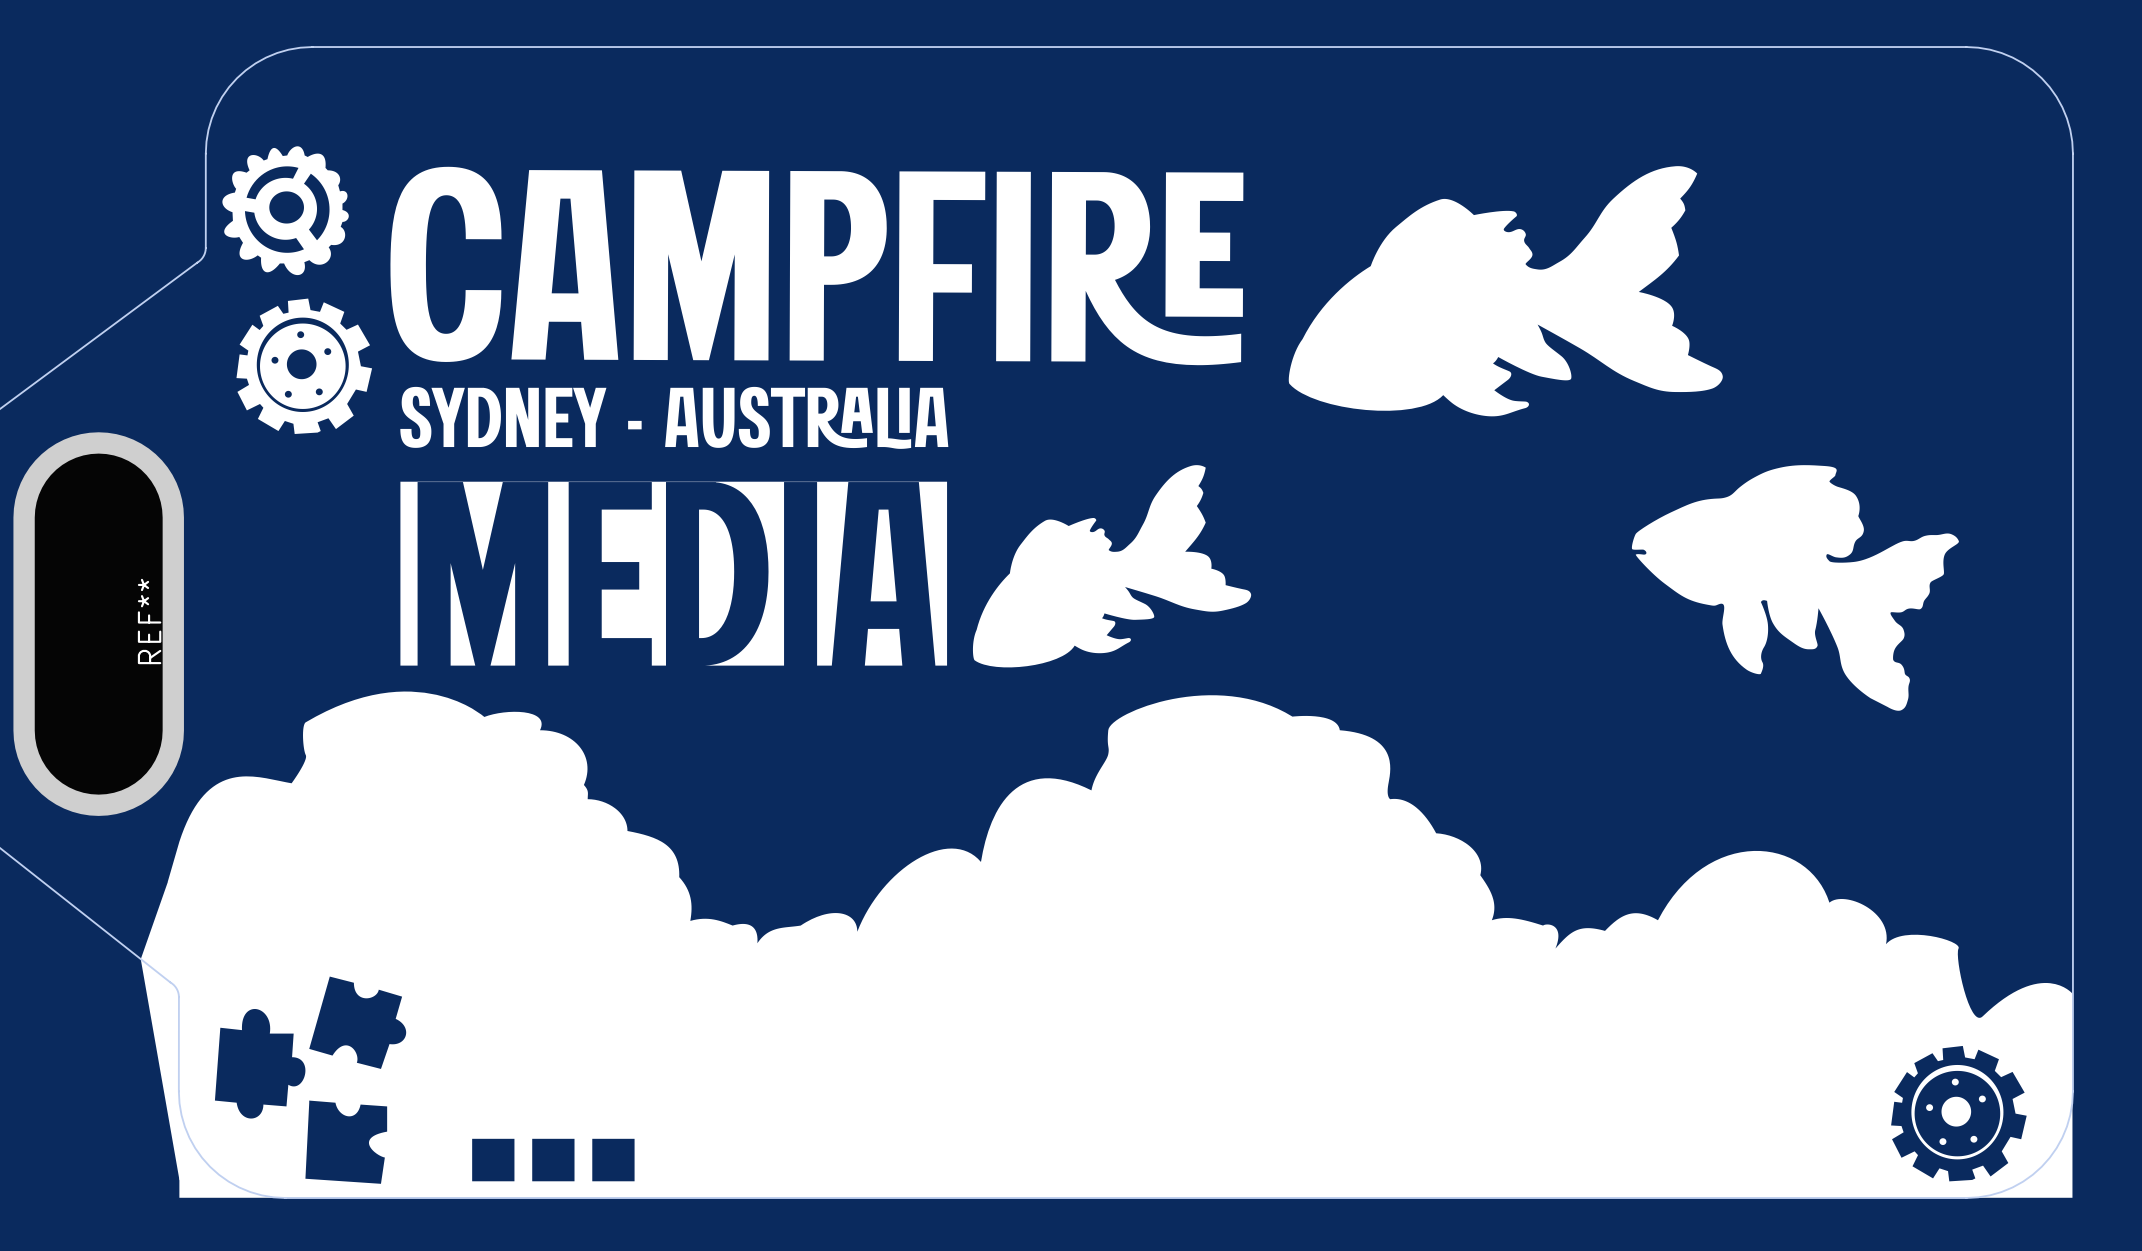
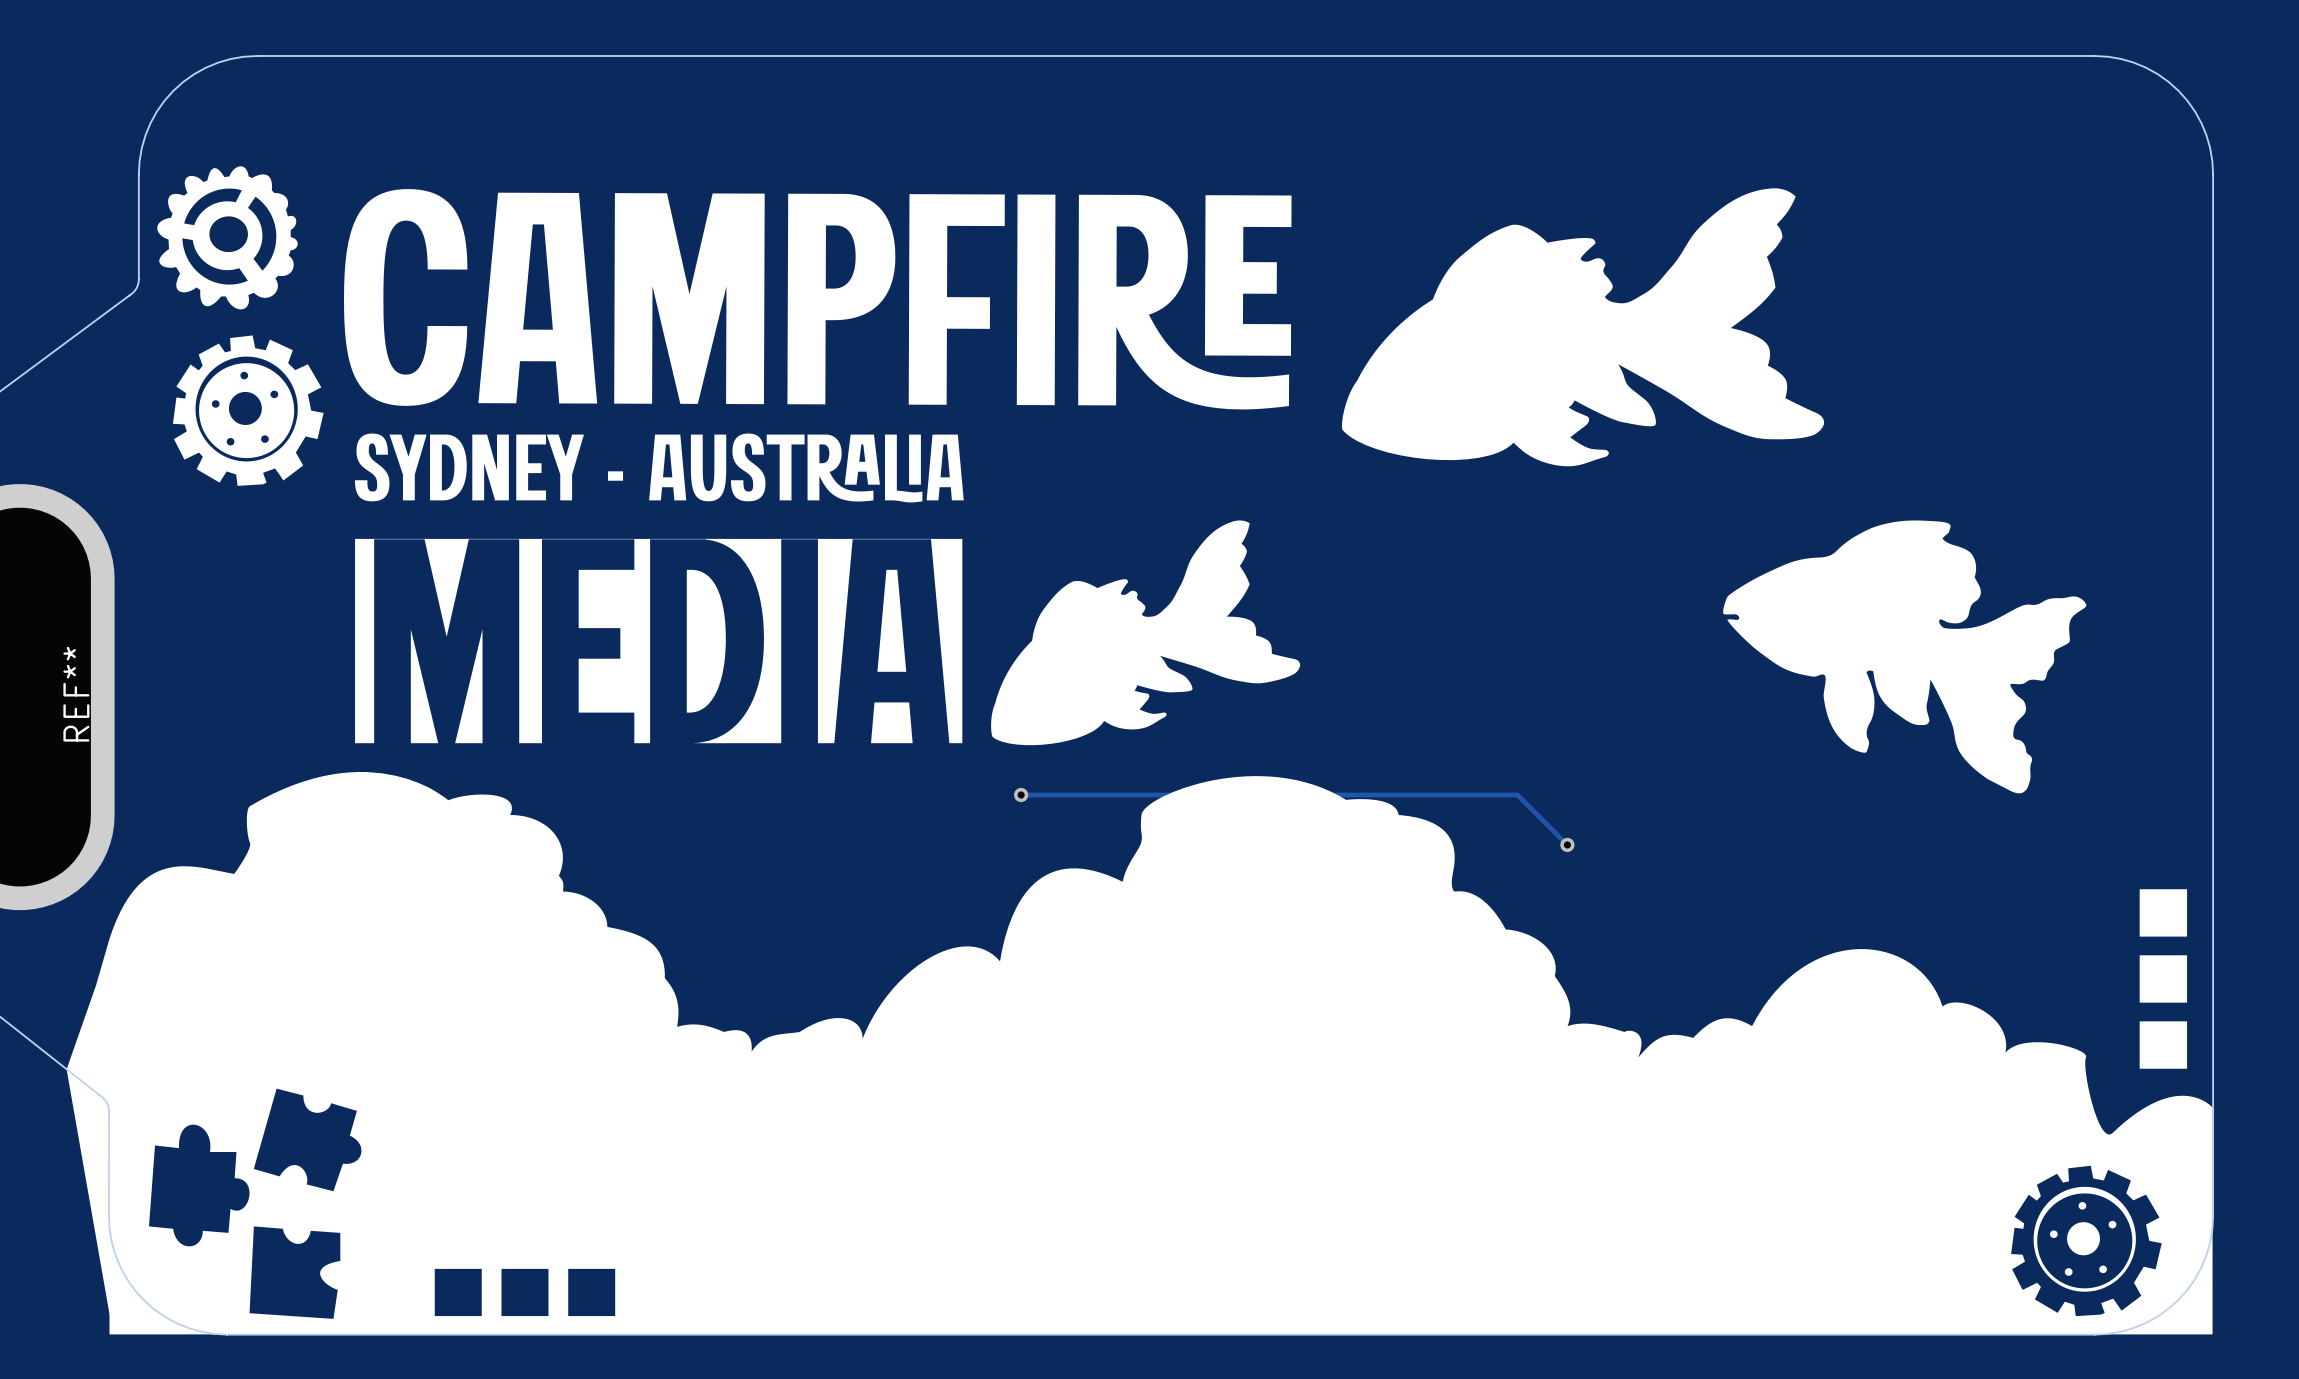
track: none -> (1021, 794) (1517, 794) (1567, 844)
via: none -> (1021, 794)
via: none -> (1567, 844)
drawing: none -> [2139, 889, 2188, 1069]

